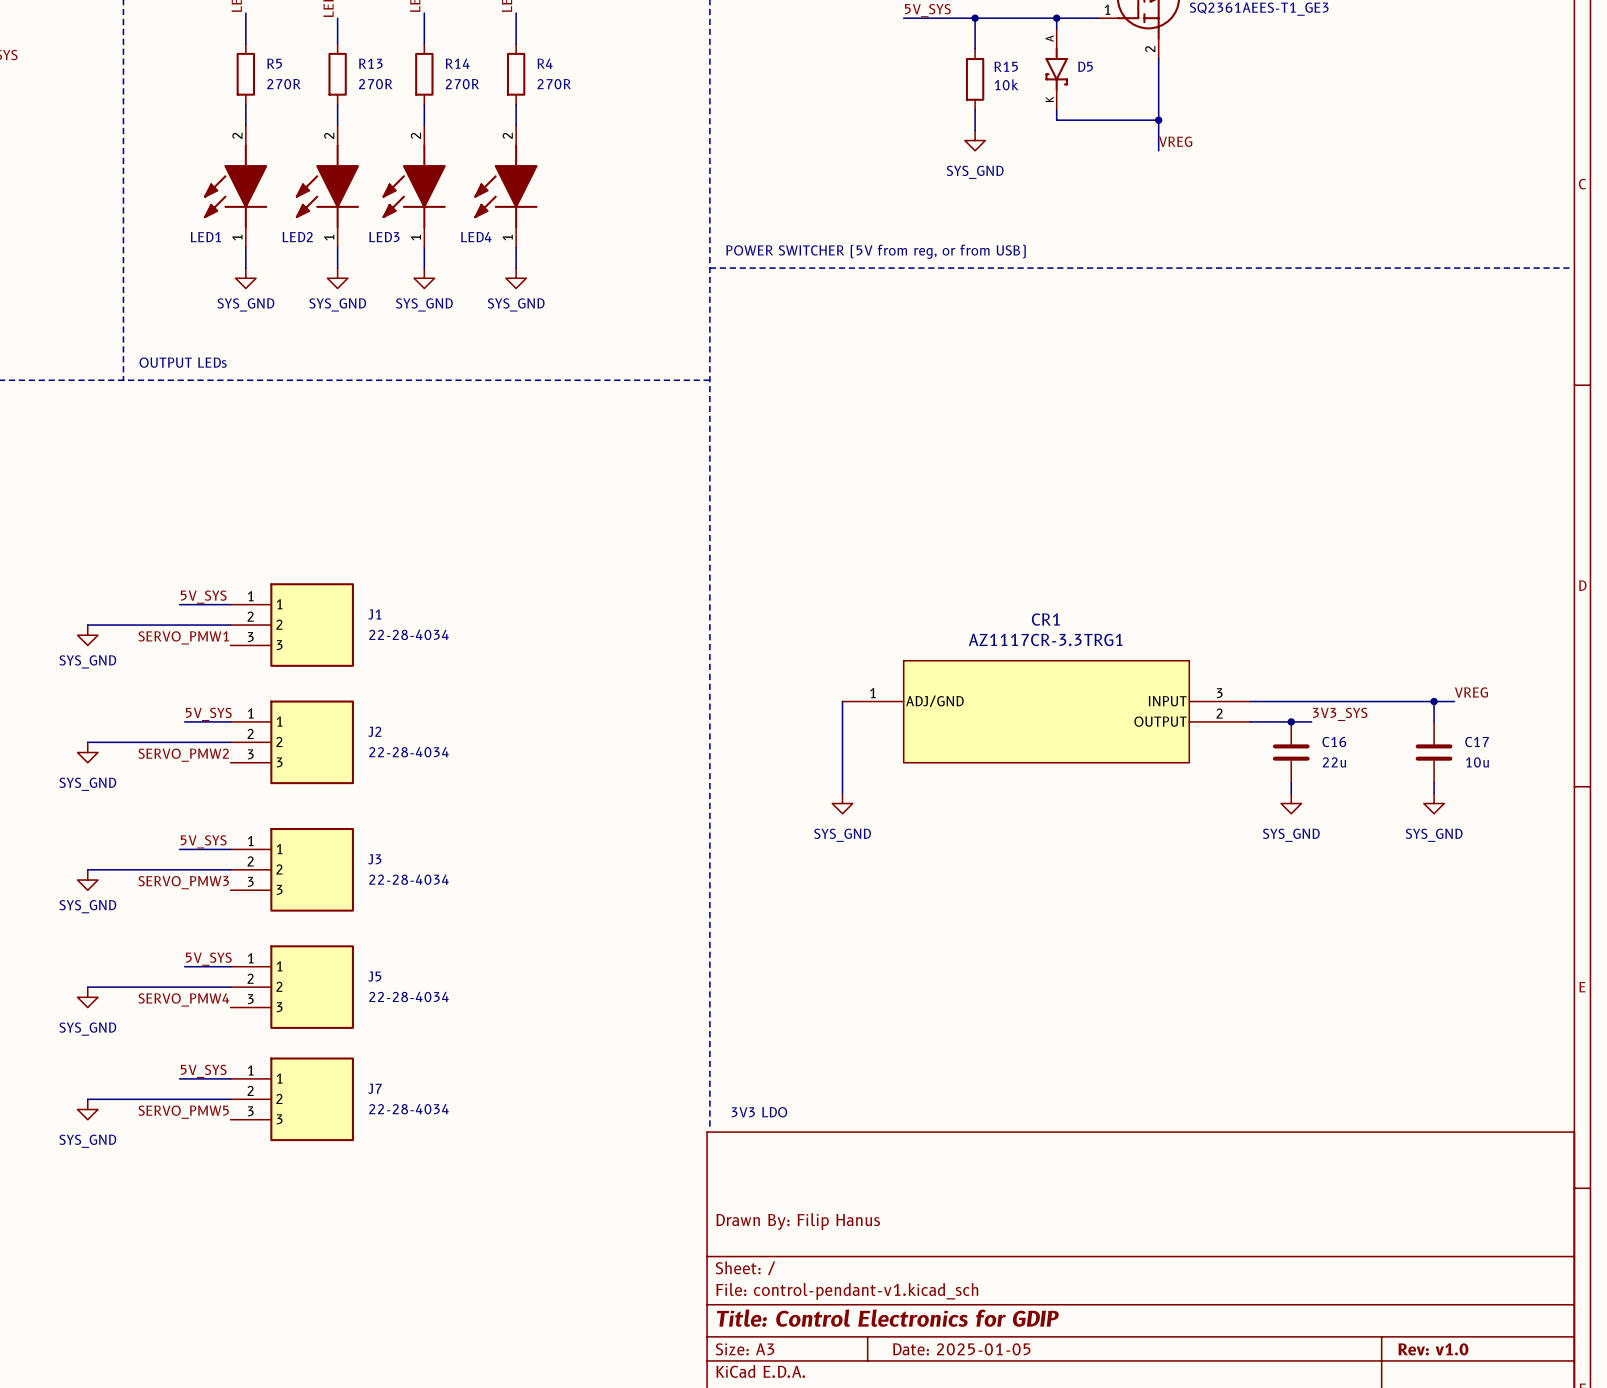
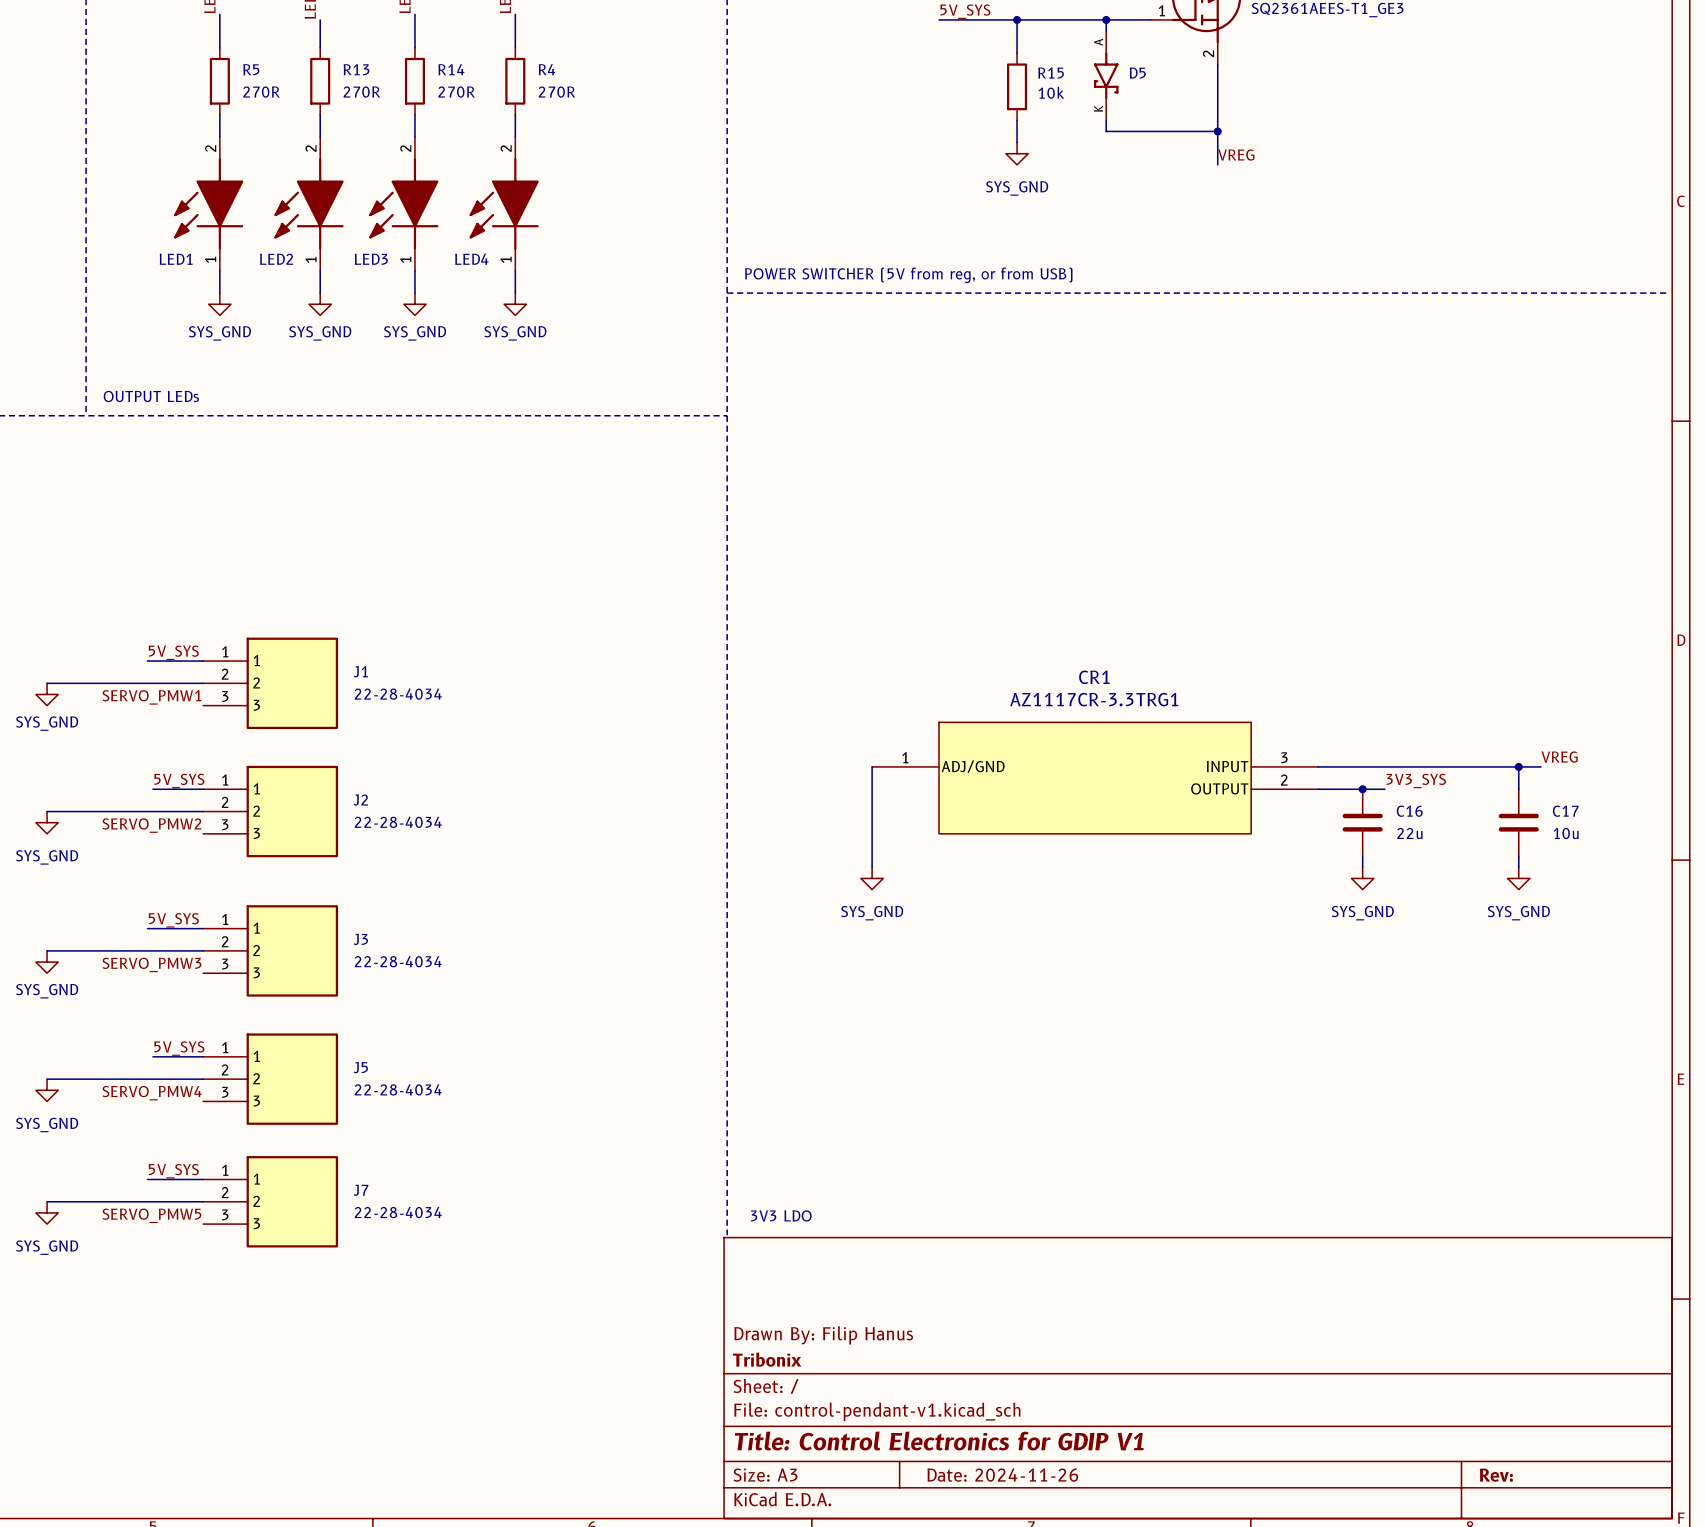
title block: none -> Tribonix (767, 1359)
title block: Title: Control Electronics for GDIP (887, 1318) -> Title: Control Electronics for GDIP V1 (939, 1441)
title block: Date: 2025-01-05 (961, 1349) -> Date: 2024-11-26 (1002, 1475)
title block: Rev: v1.0 (1433, 1349) -> Rev: (1496, 1475)

